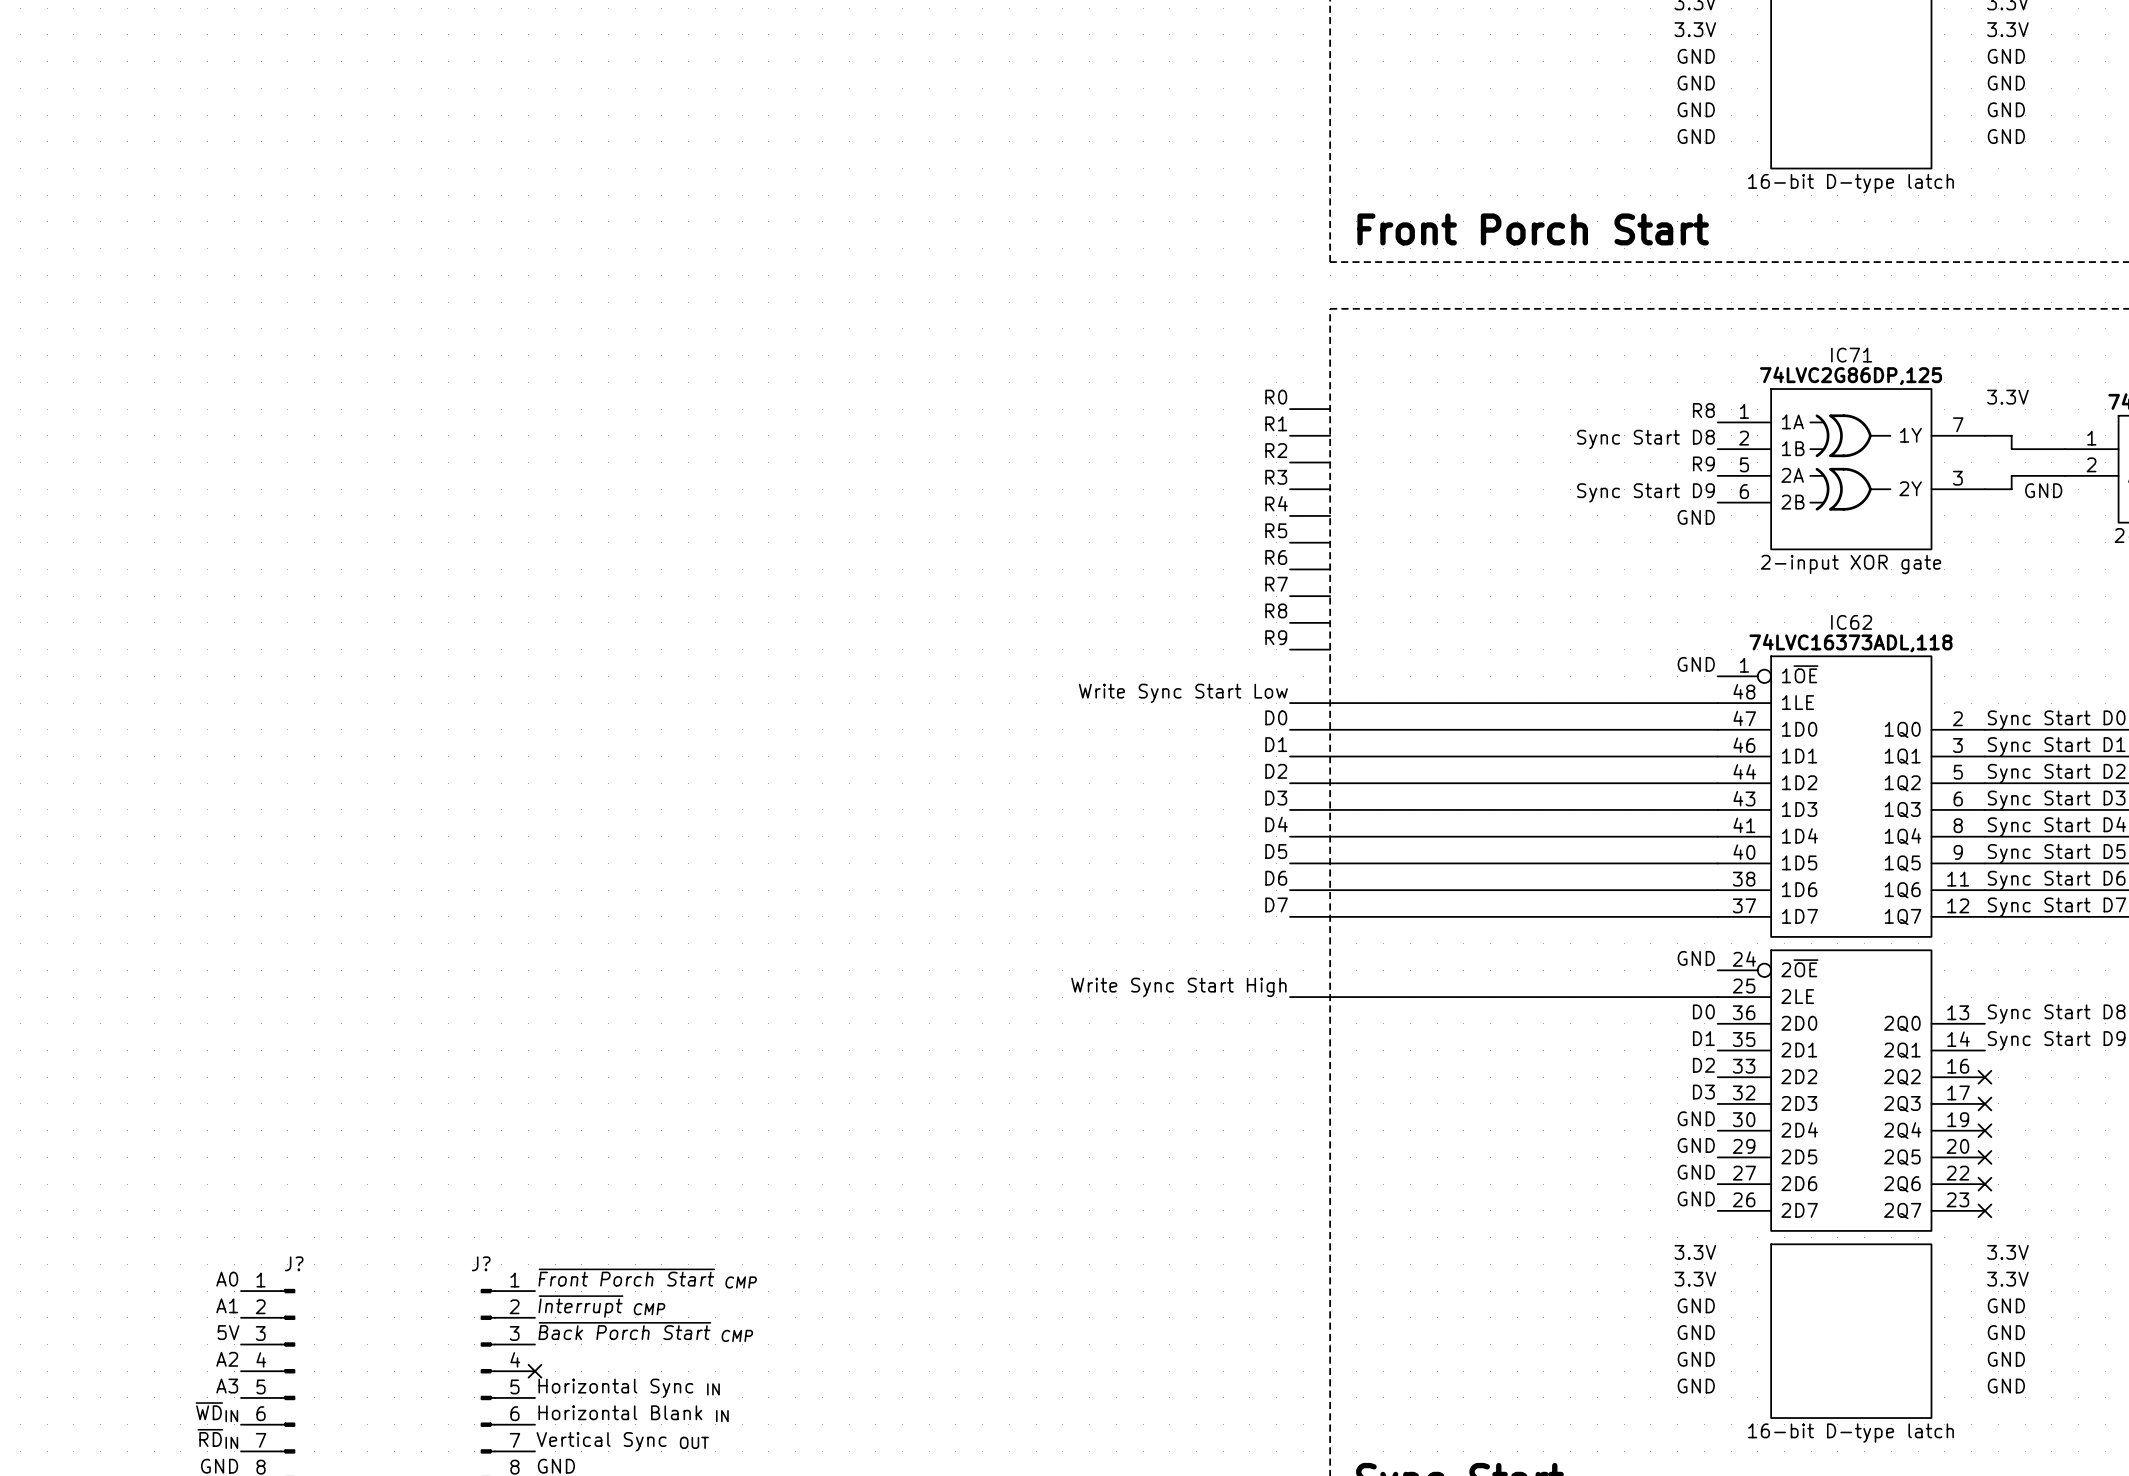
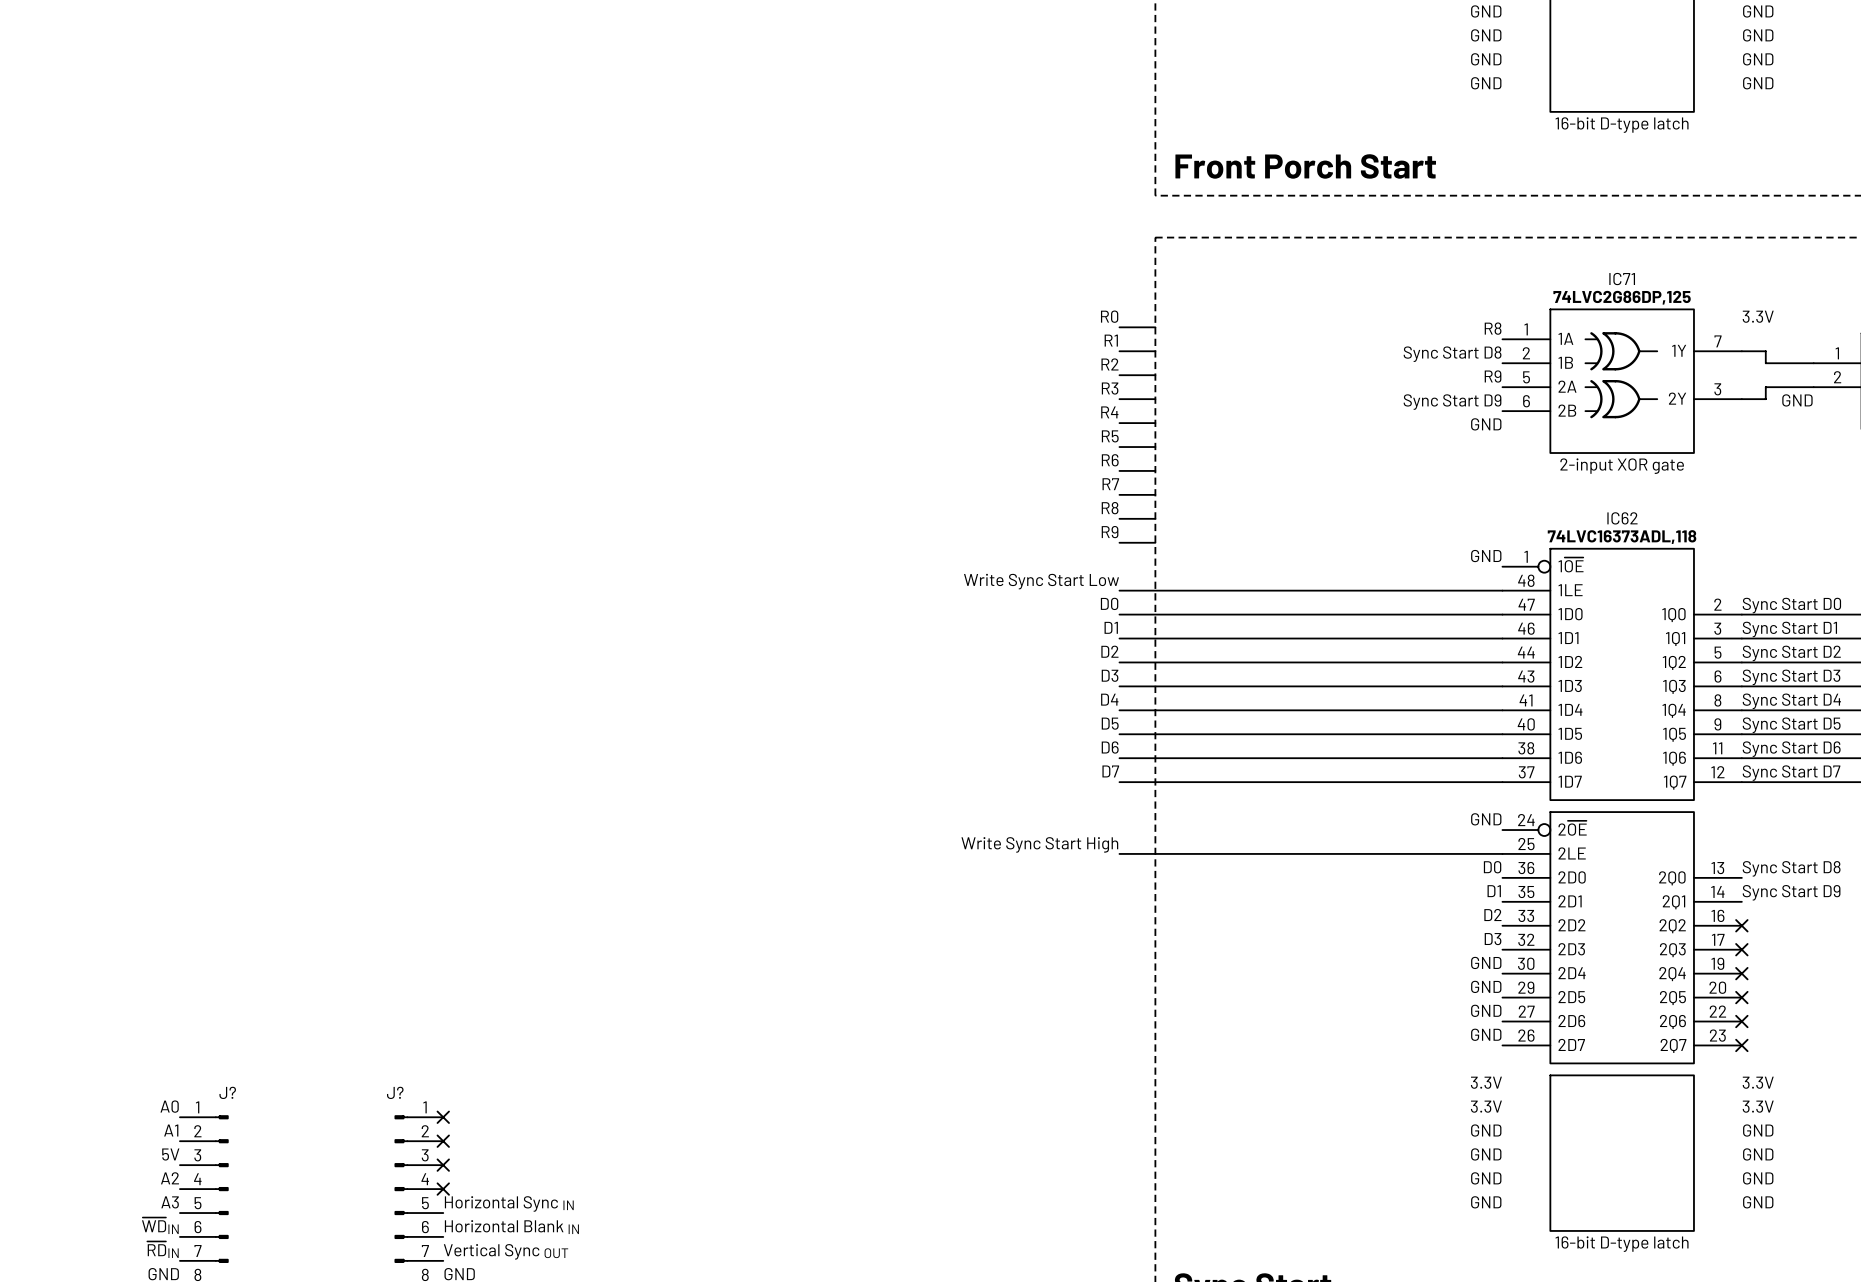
label: ~{Front Porch Start} CMP (647, 1278) -> none
no-connect mark: none -> (443, 1117)
label: ~{Interrupt} CMP (601, 1306) -> none
no-connect mark: none -> (443, 1141)
label: ~{Back Porch Start} CMP (645, 1332) -> none
no-connect mark: none -> (443, 1165)

